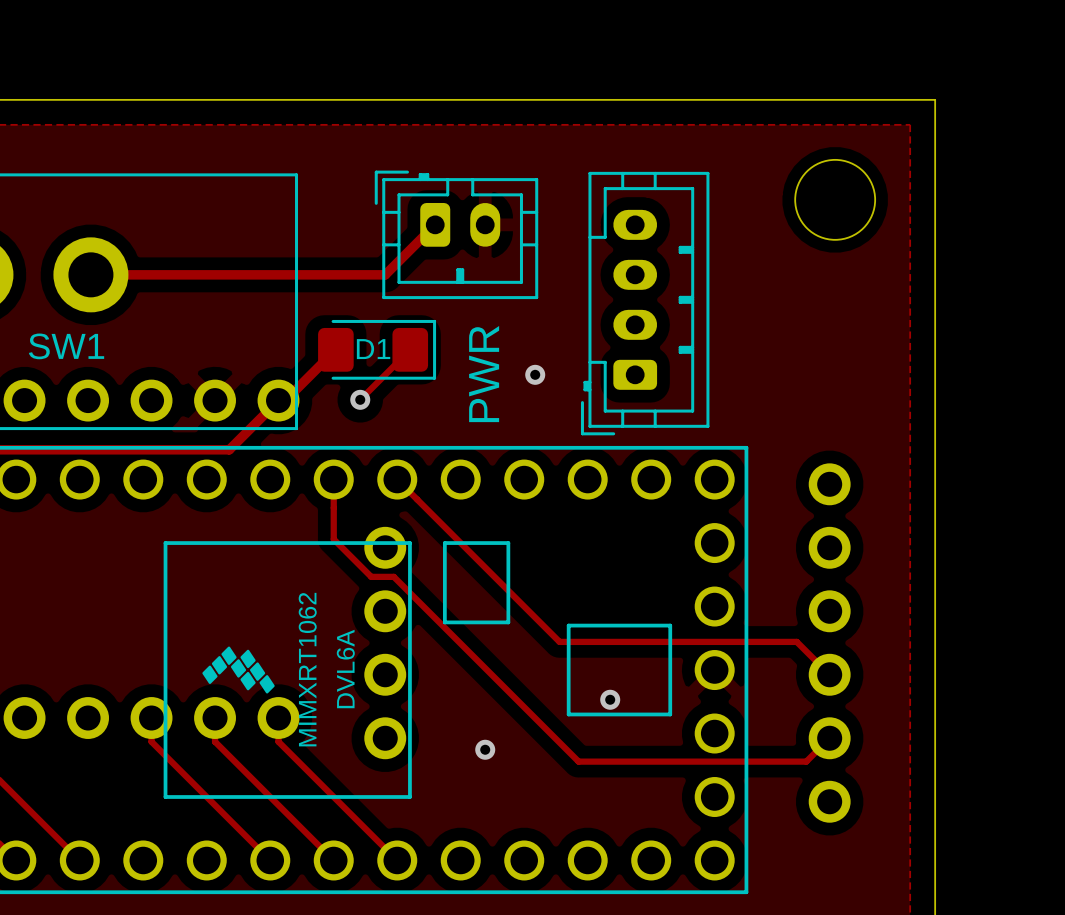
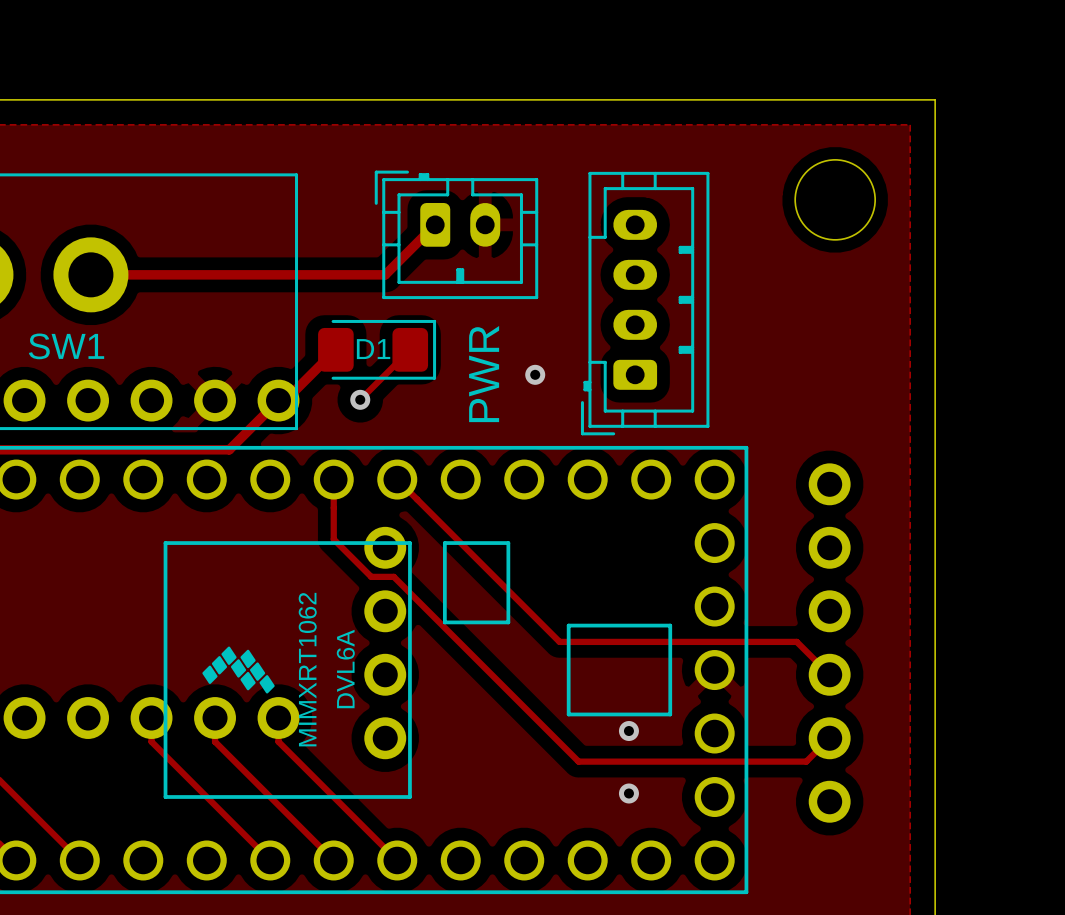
via position: (610, 699) -> (628, 731)
via: (485, 749) -> none
via: none -> (628, 793)

